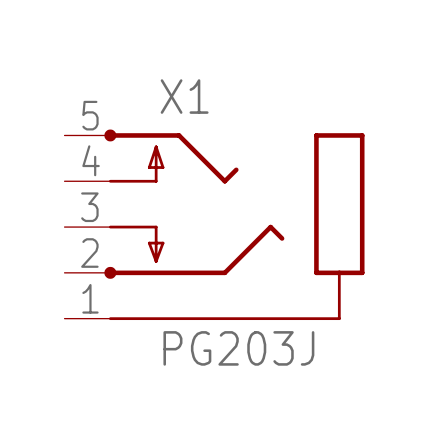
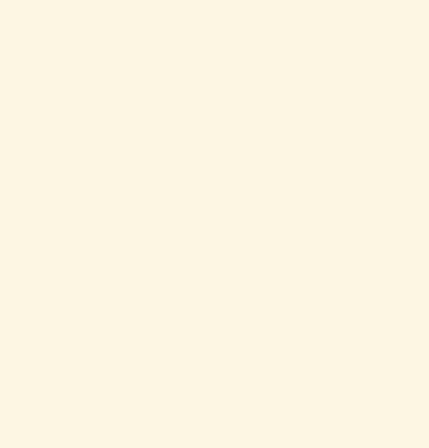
X1: PG203J (214, 224) -> none

